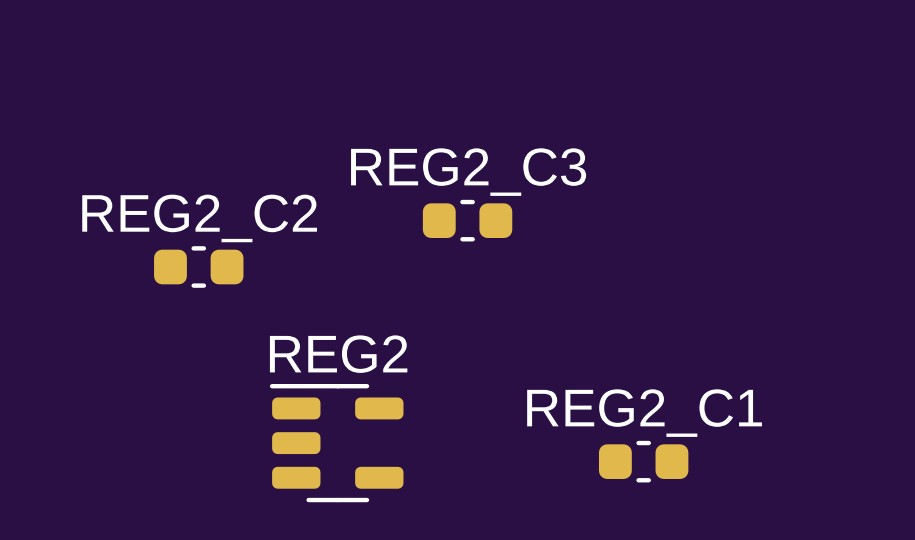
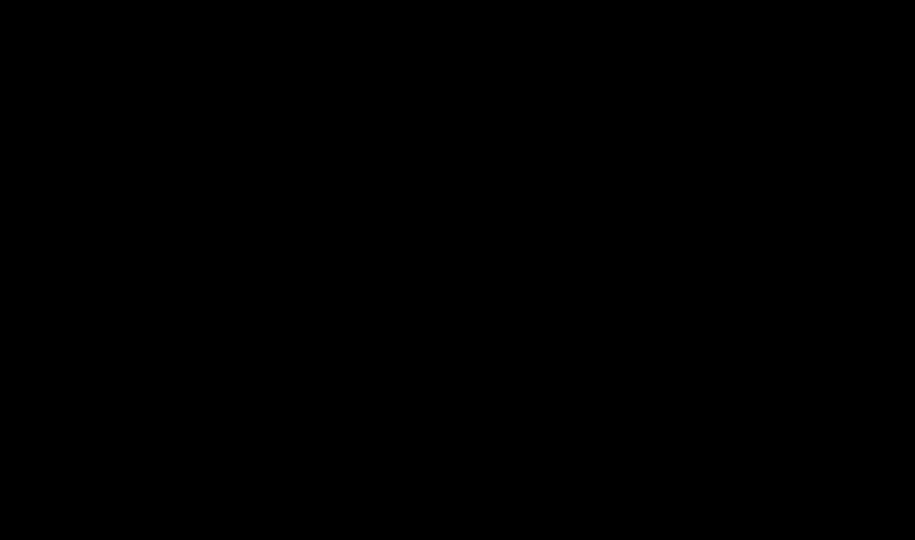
REG2_C3: (467, 220) -> none
REG2_C2: (198, 267) -> none
REG2: (336, 443) -> none
REG2_C1: (643, 461) -> none

